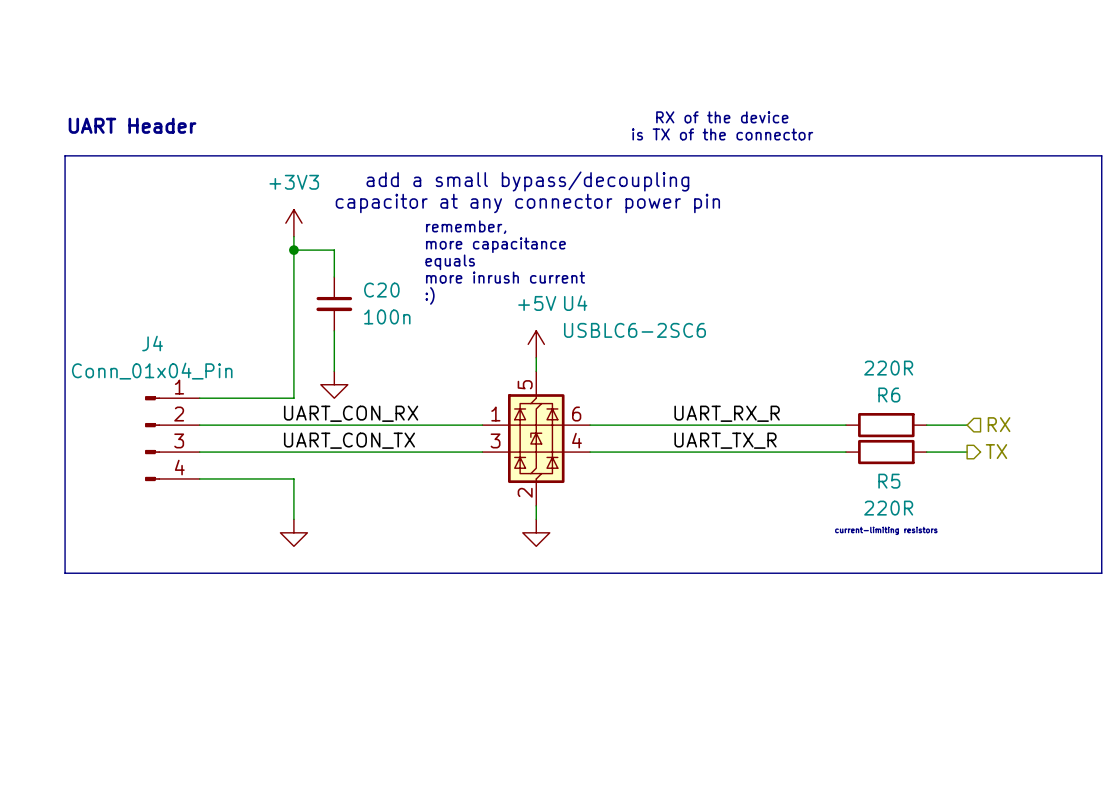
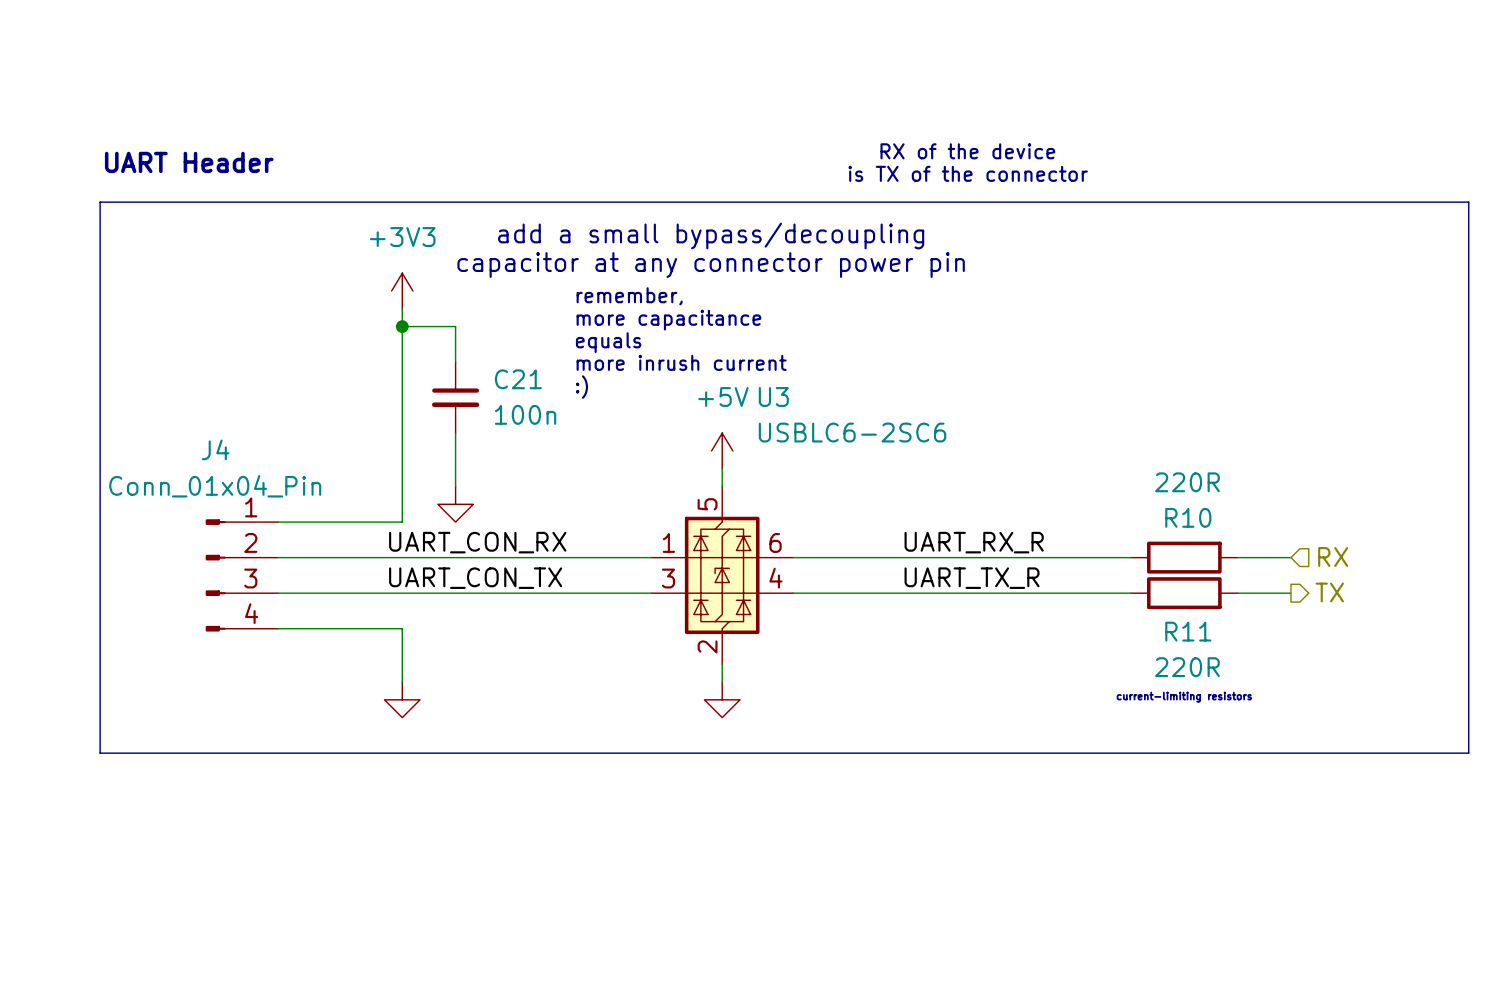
C20 name: C20 (381, 290) -> C21 (518, 379)
U4 name: U4 (575, 303) -> U3 (773, 397)
R6 name: R6 (889, 395) -> R10 (1188, 517)
R5 name: R5 (889, 481) -> R11 (1188, 631)

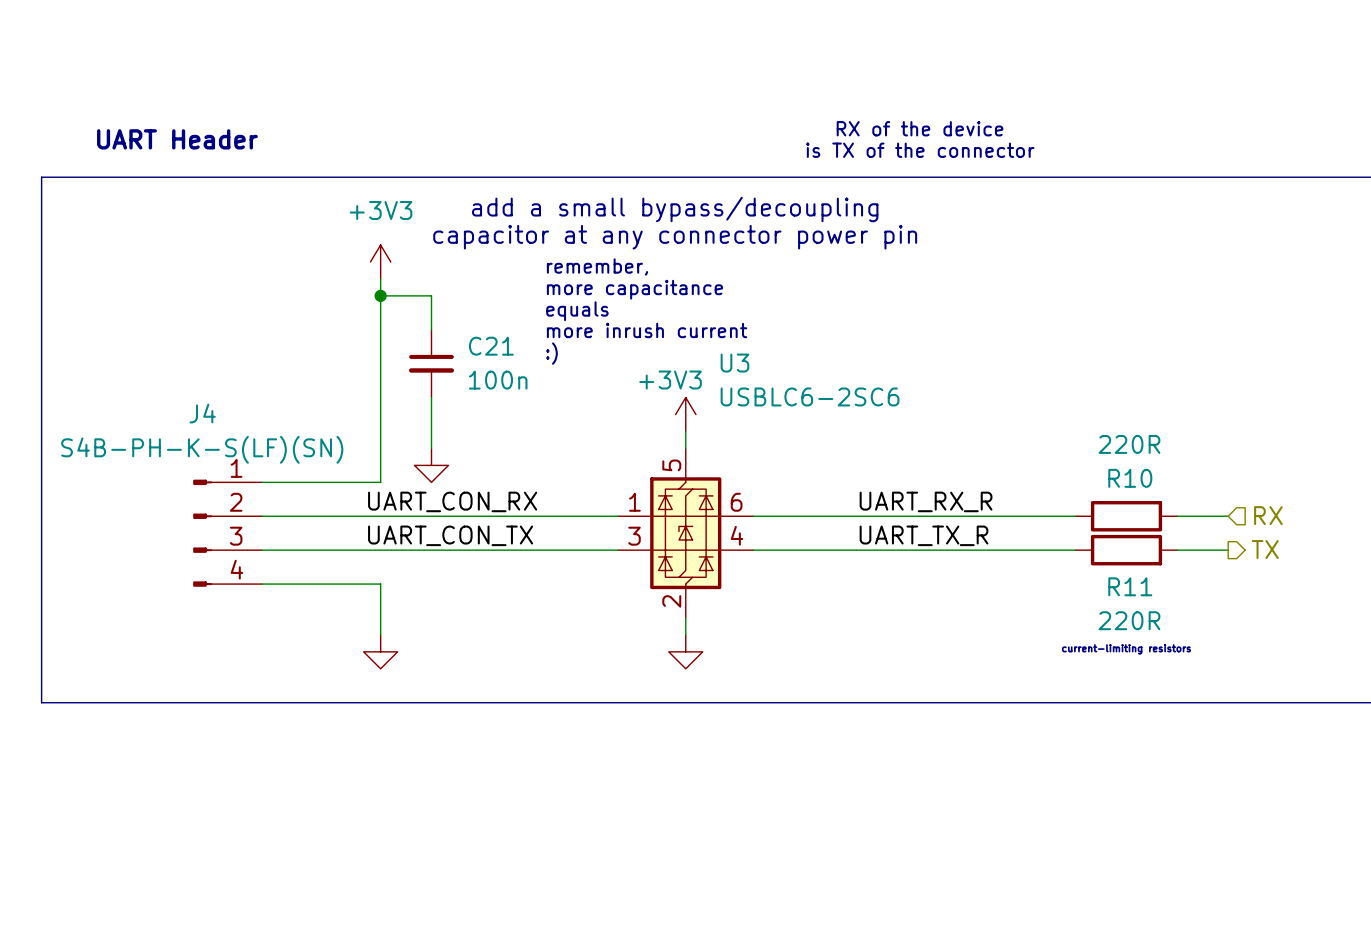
line: (100, 202) (100, 753) -> (92, 177) (41, 177) (41, 702) (92, 702)
power symbol: +5V (722, 450) -> +3V3 (685, 414)
J4 value: Conn_01x04_Pin (215, 486) -> S4B-PH-K-S(LF)(SN) (202, 449)

